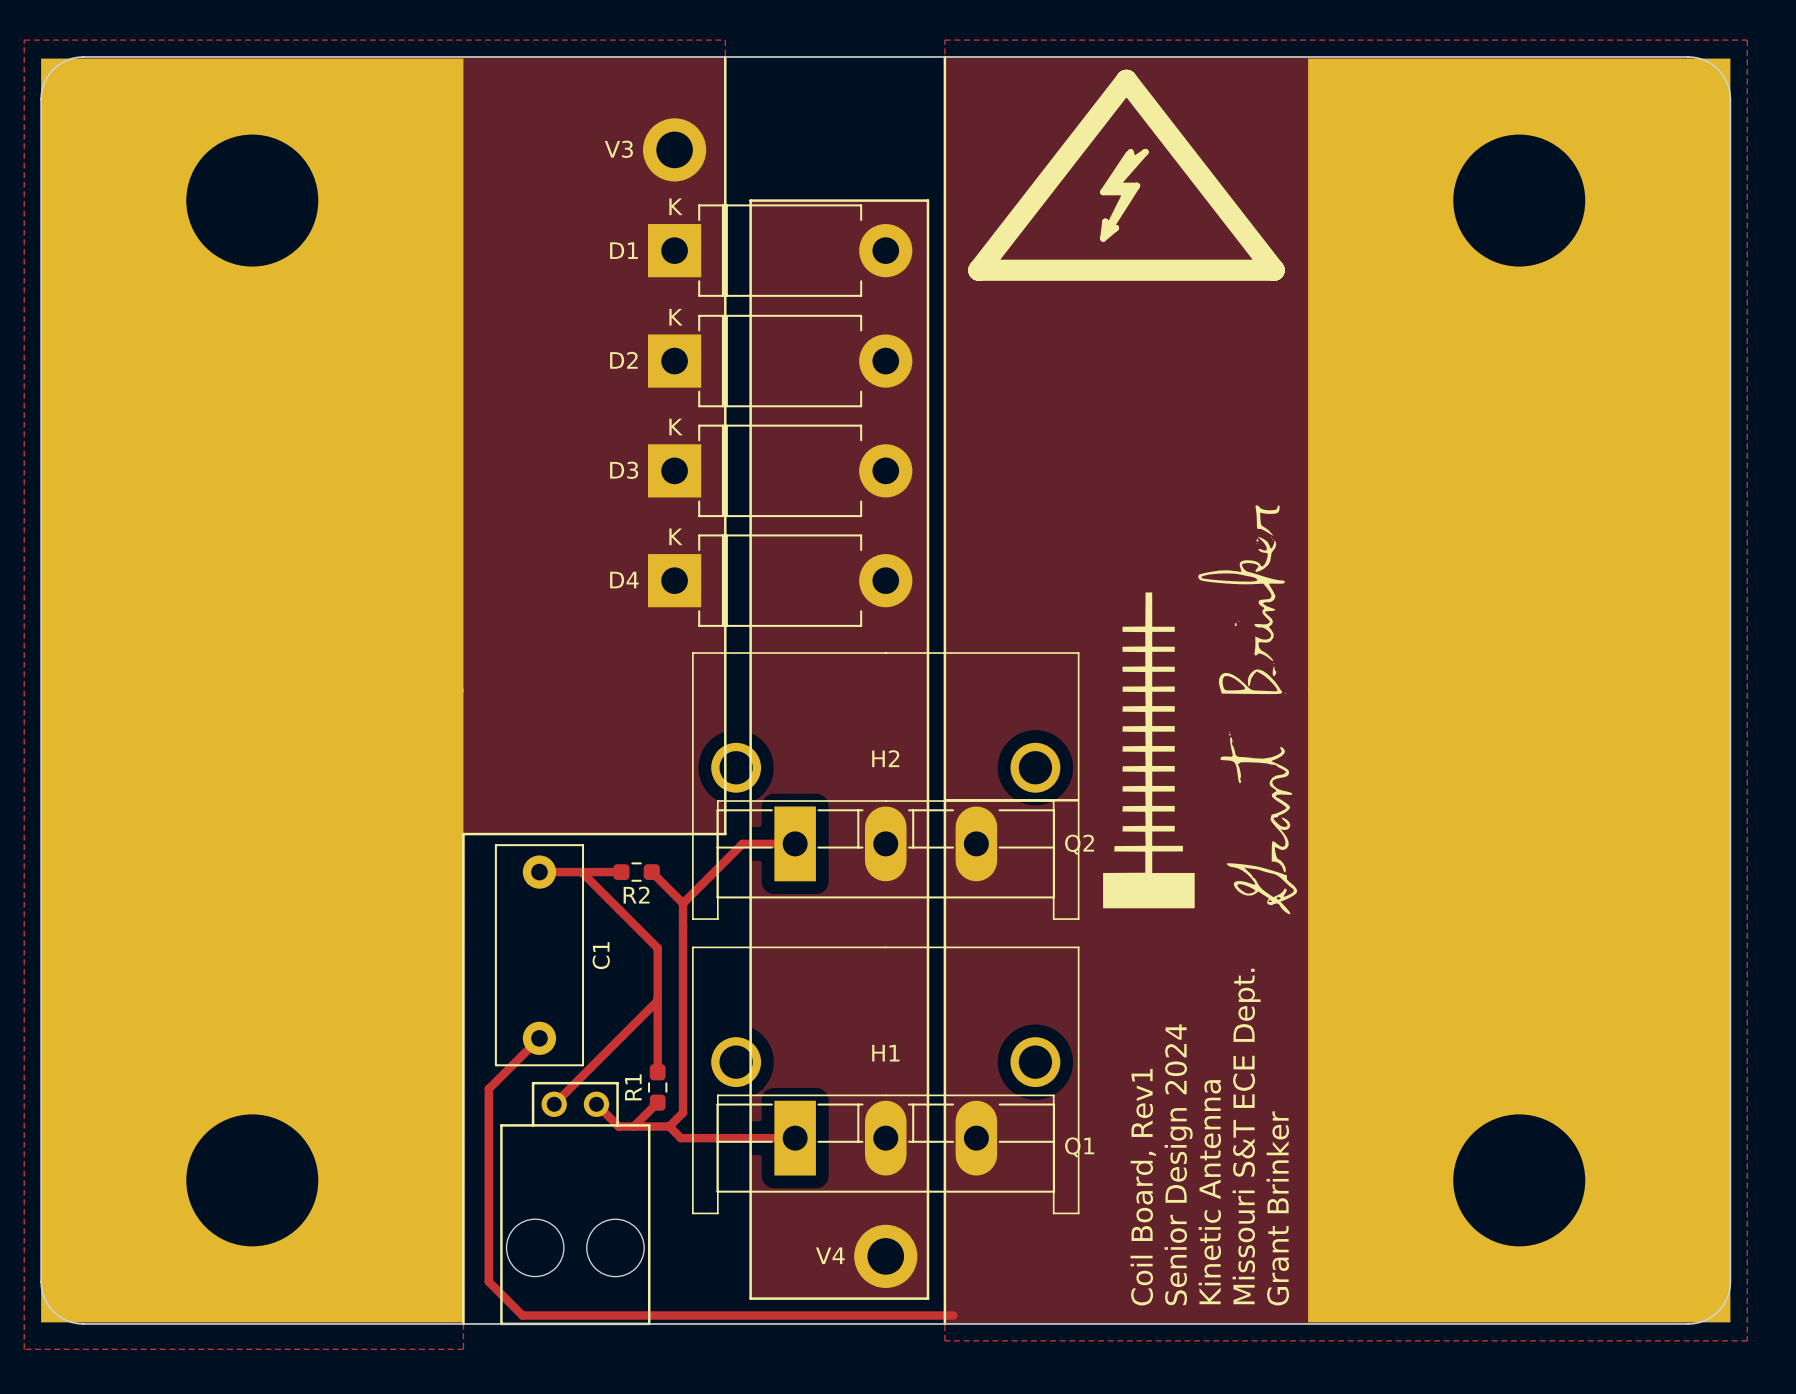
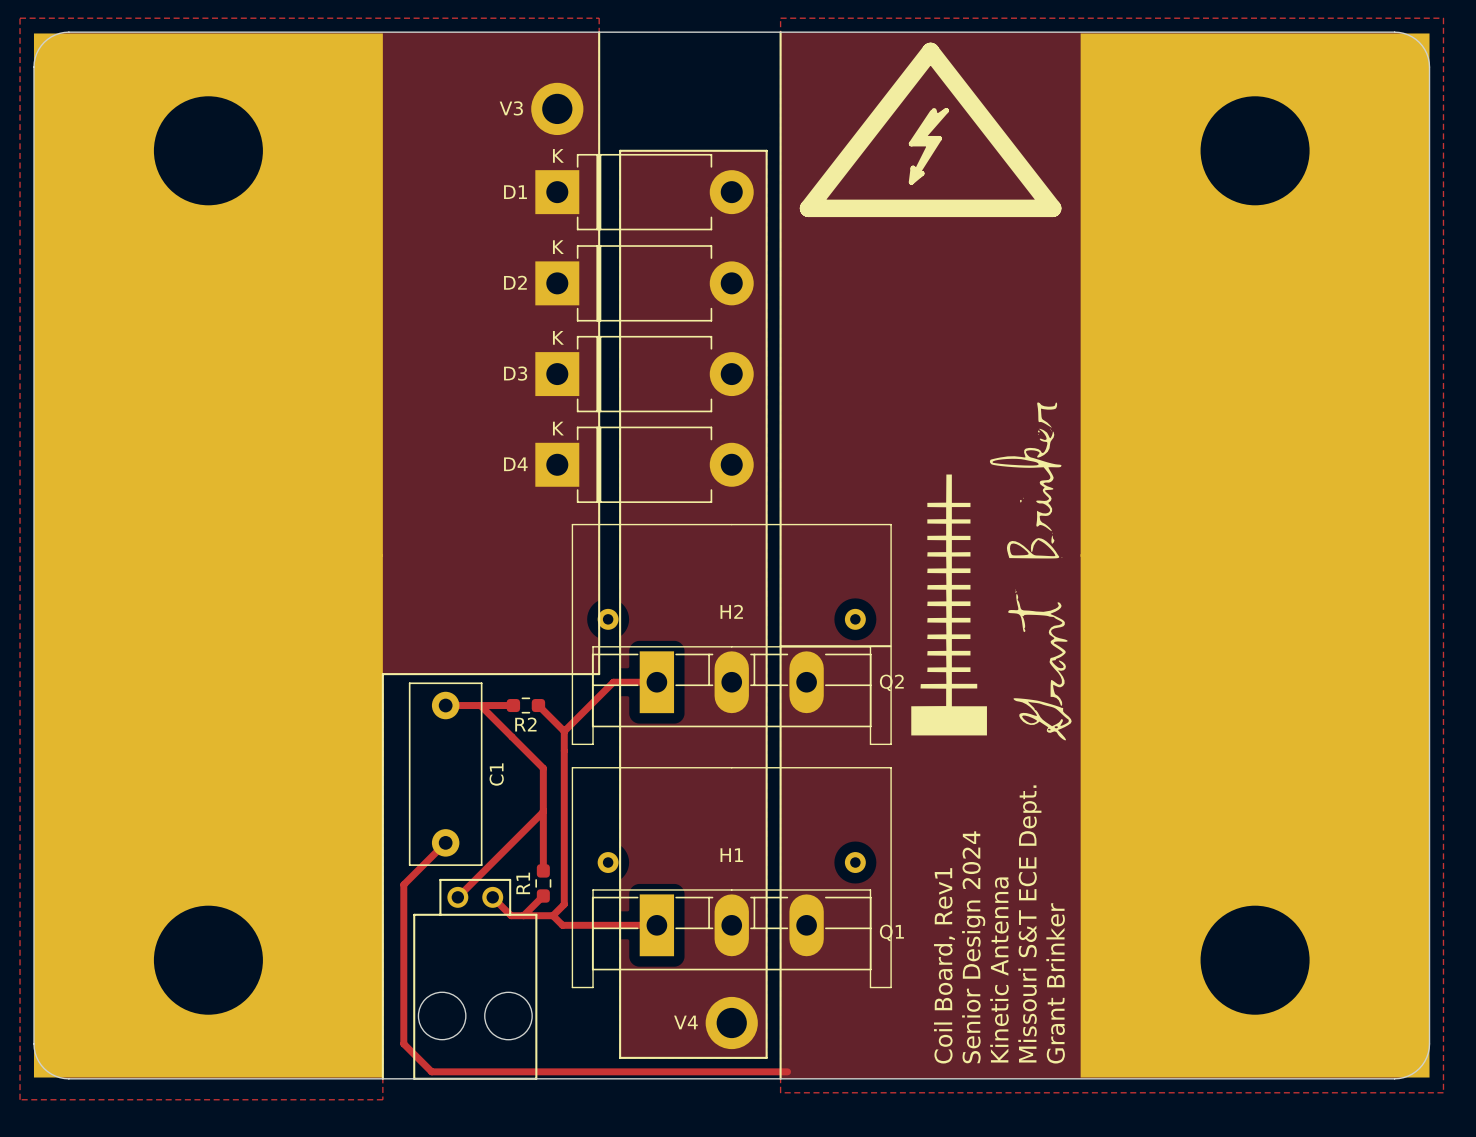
H2 footprint: [692, 652, 1080, 920] -> [571, 523, 892, 746]
H1 footprint: [692, 946, 1080, 1215] -> [571, 767, 892, 989]

